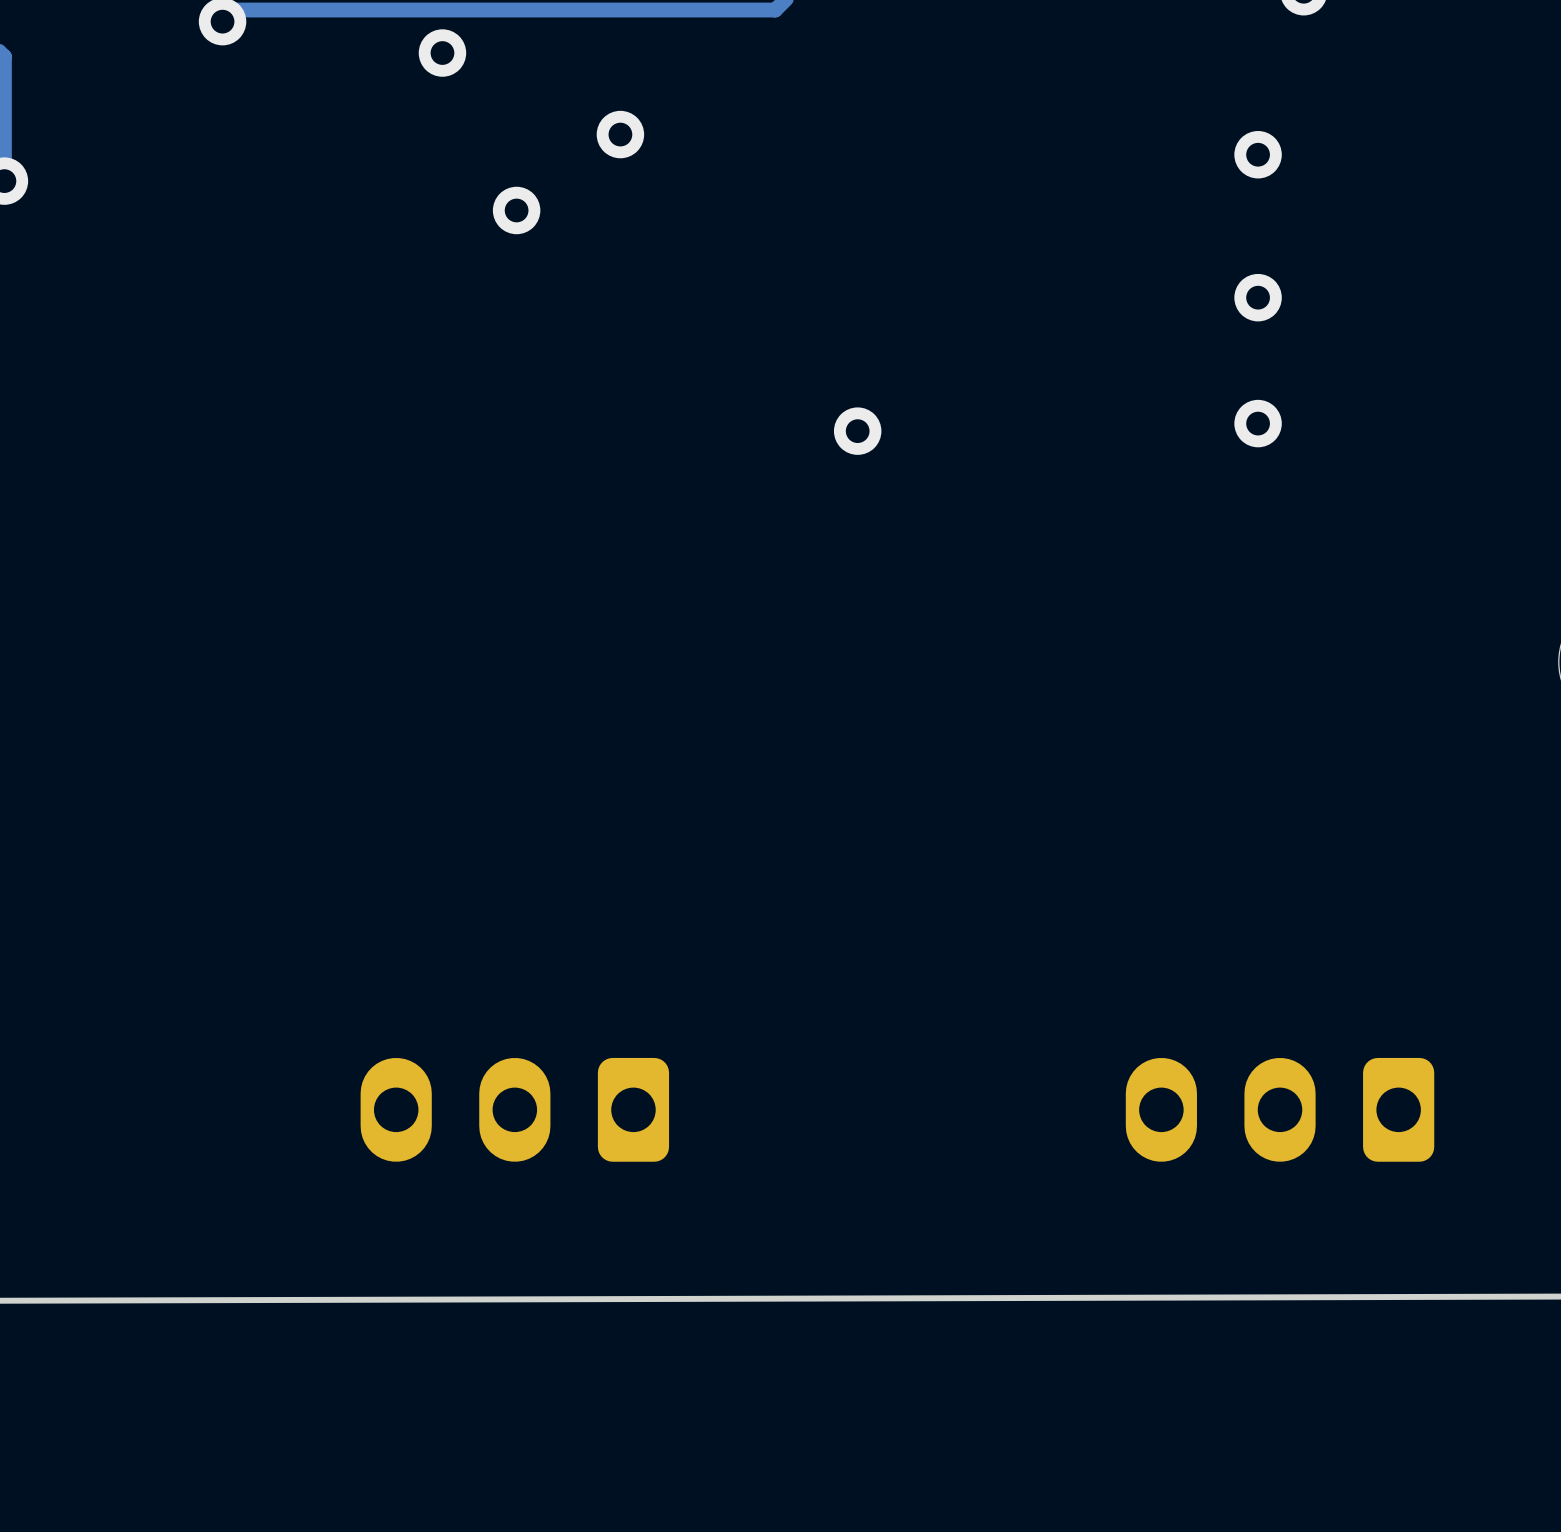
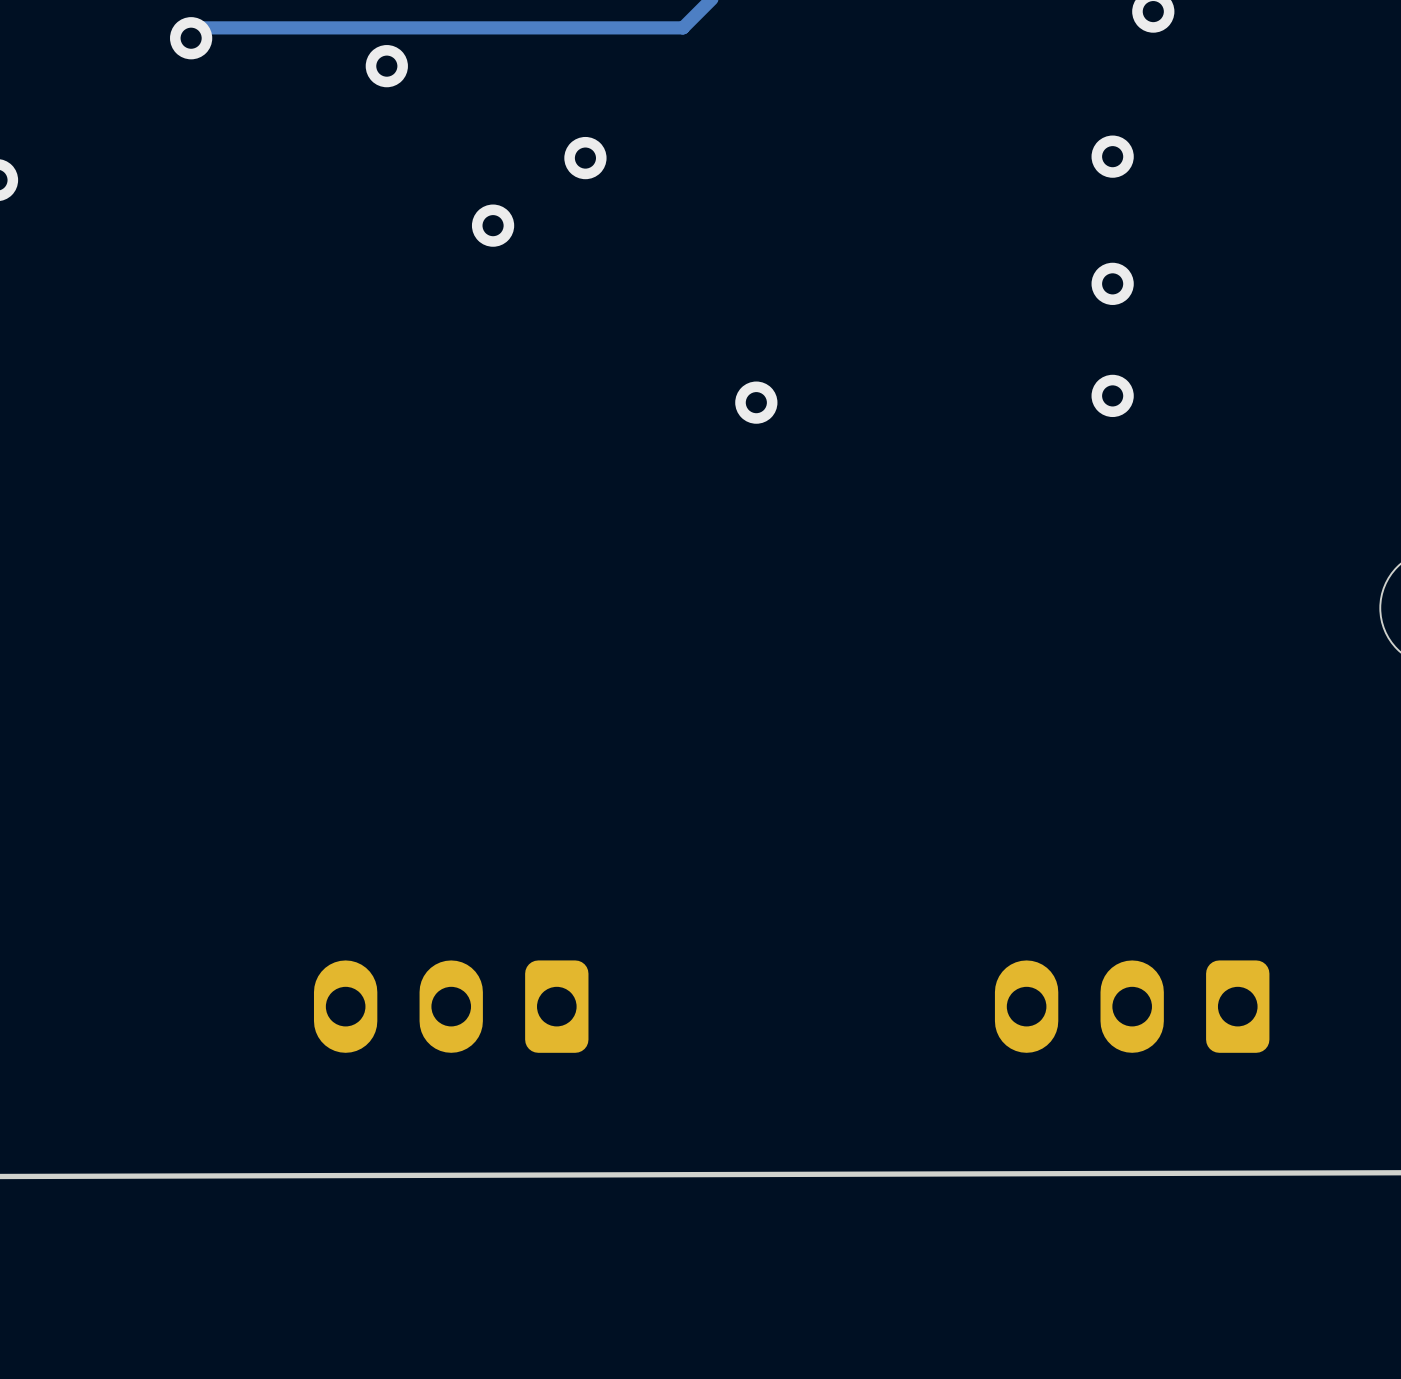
via position: (620, 134) -> (585, 158)
via position: (516, 210) -> (493, 225)

